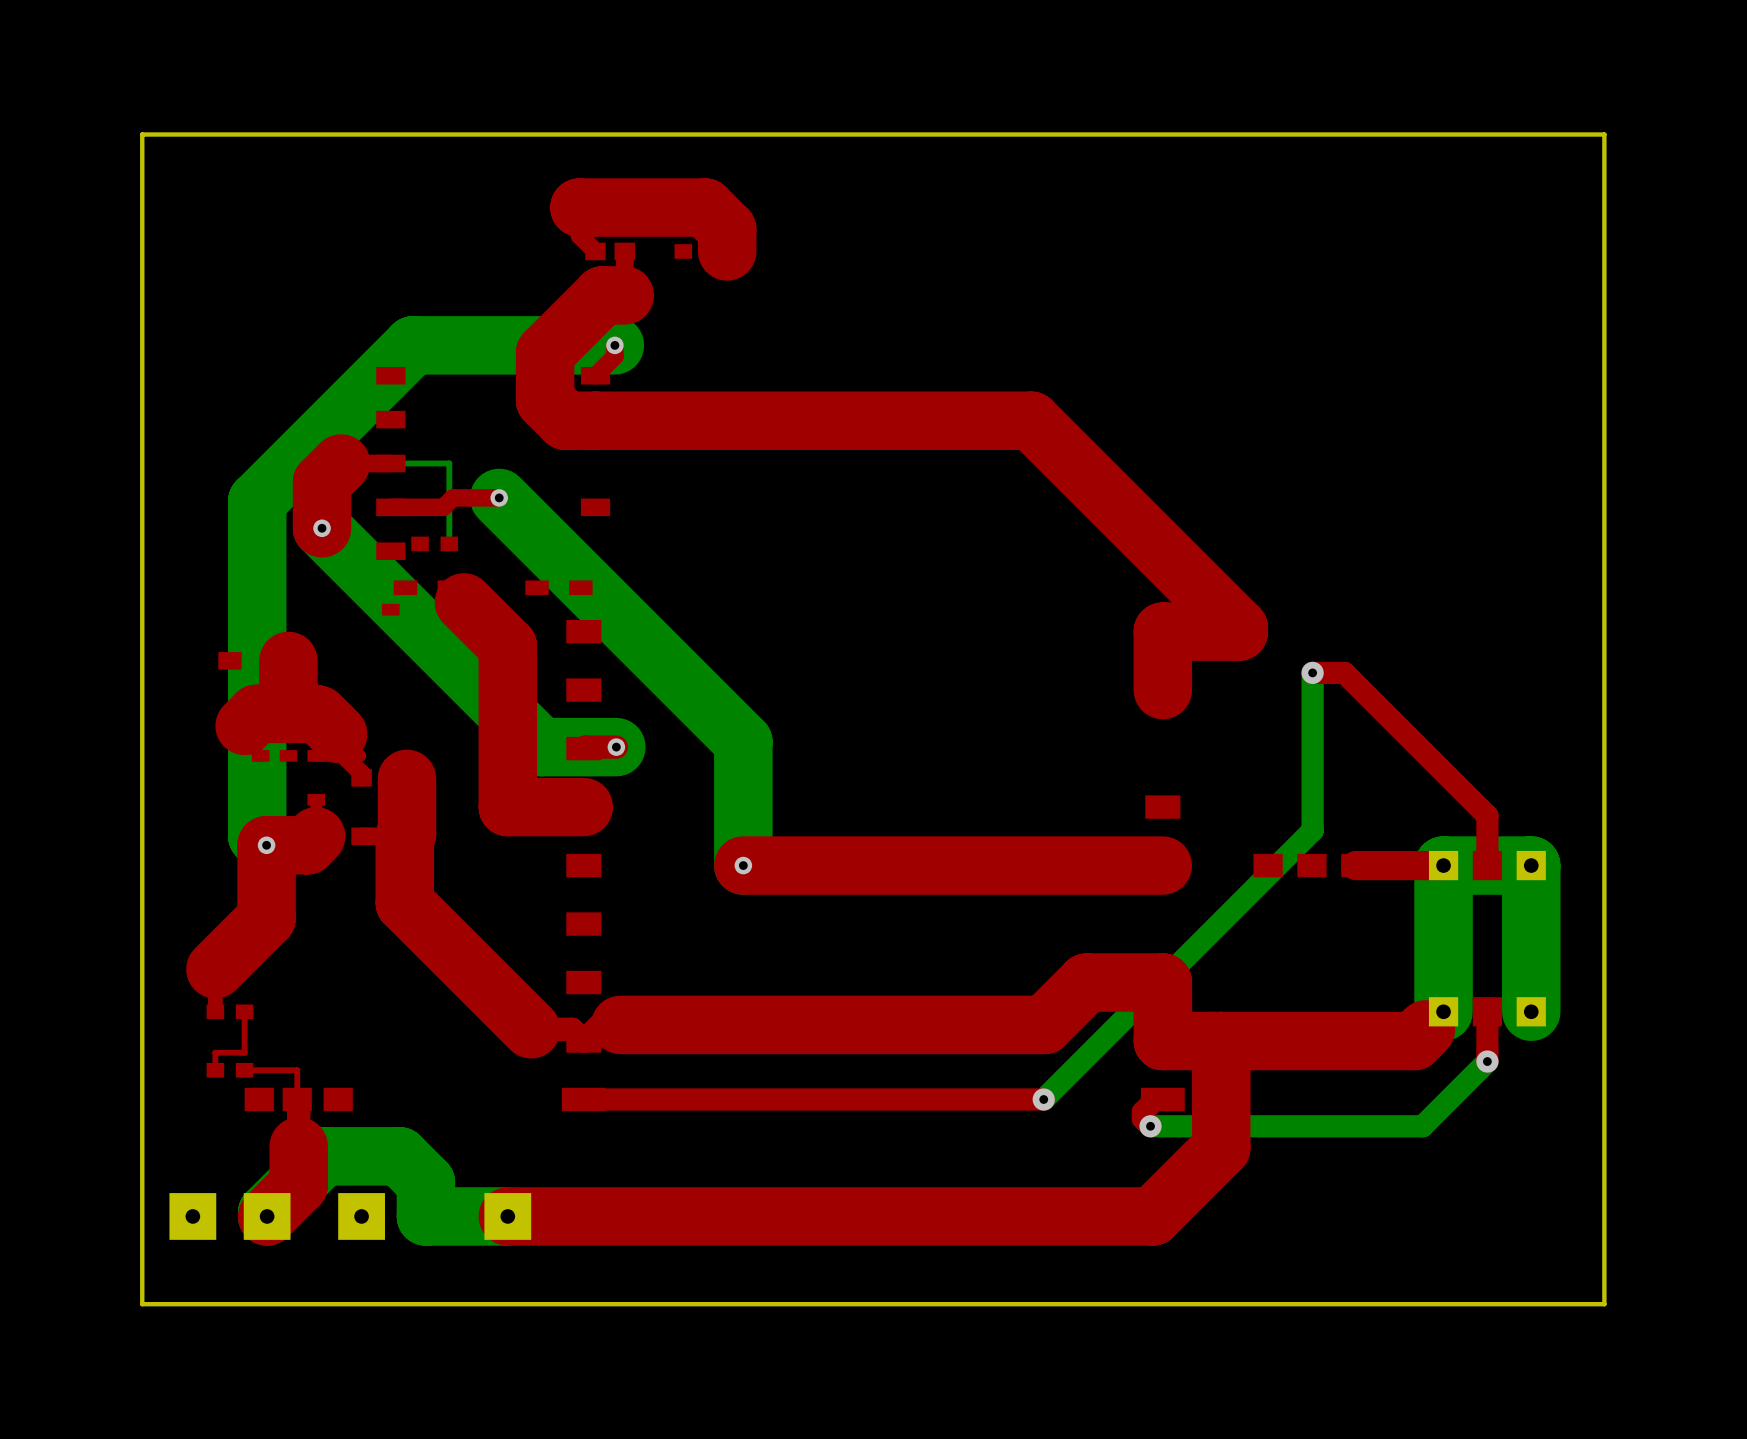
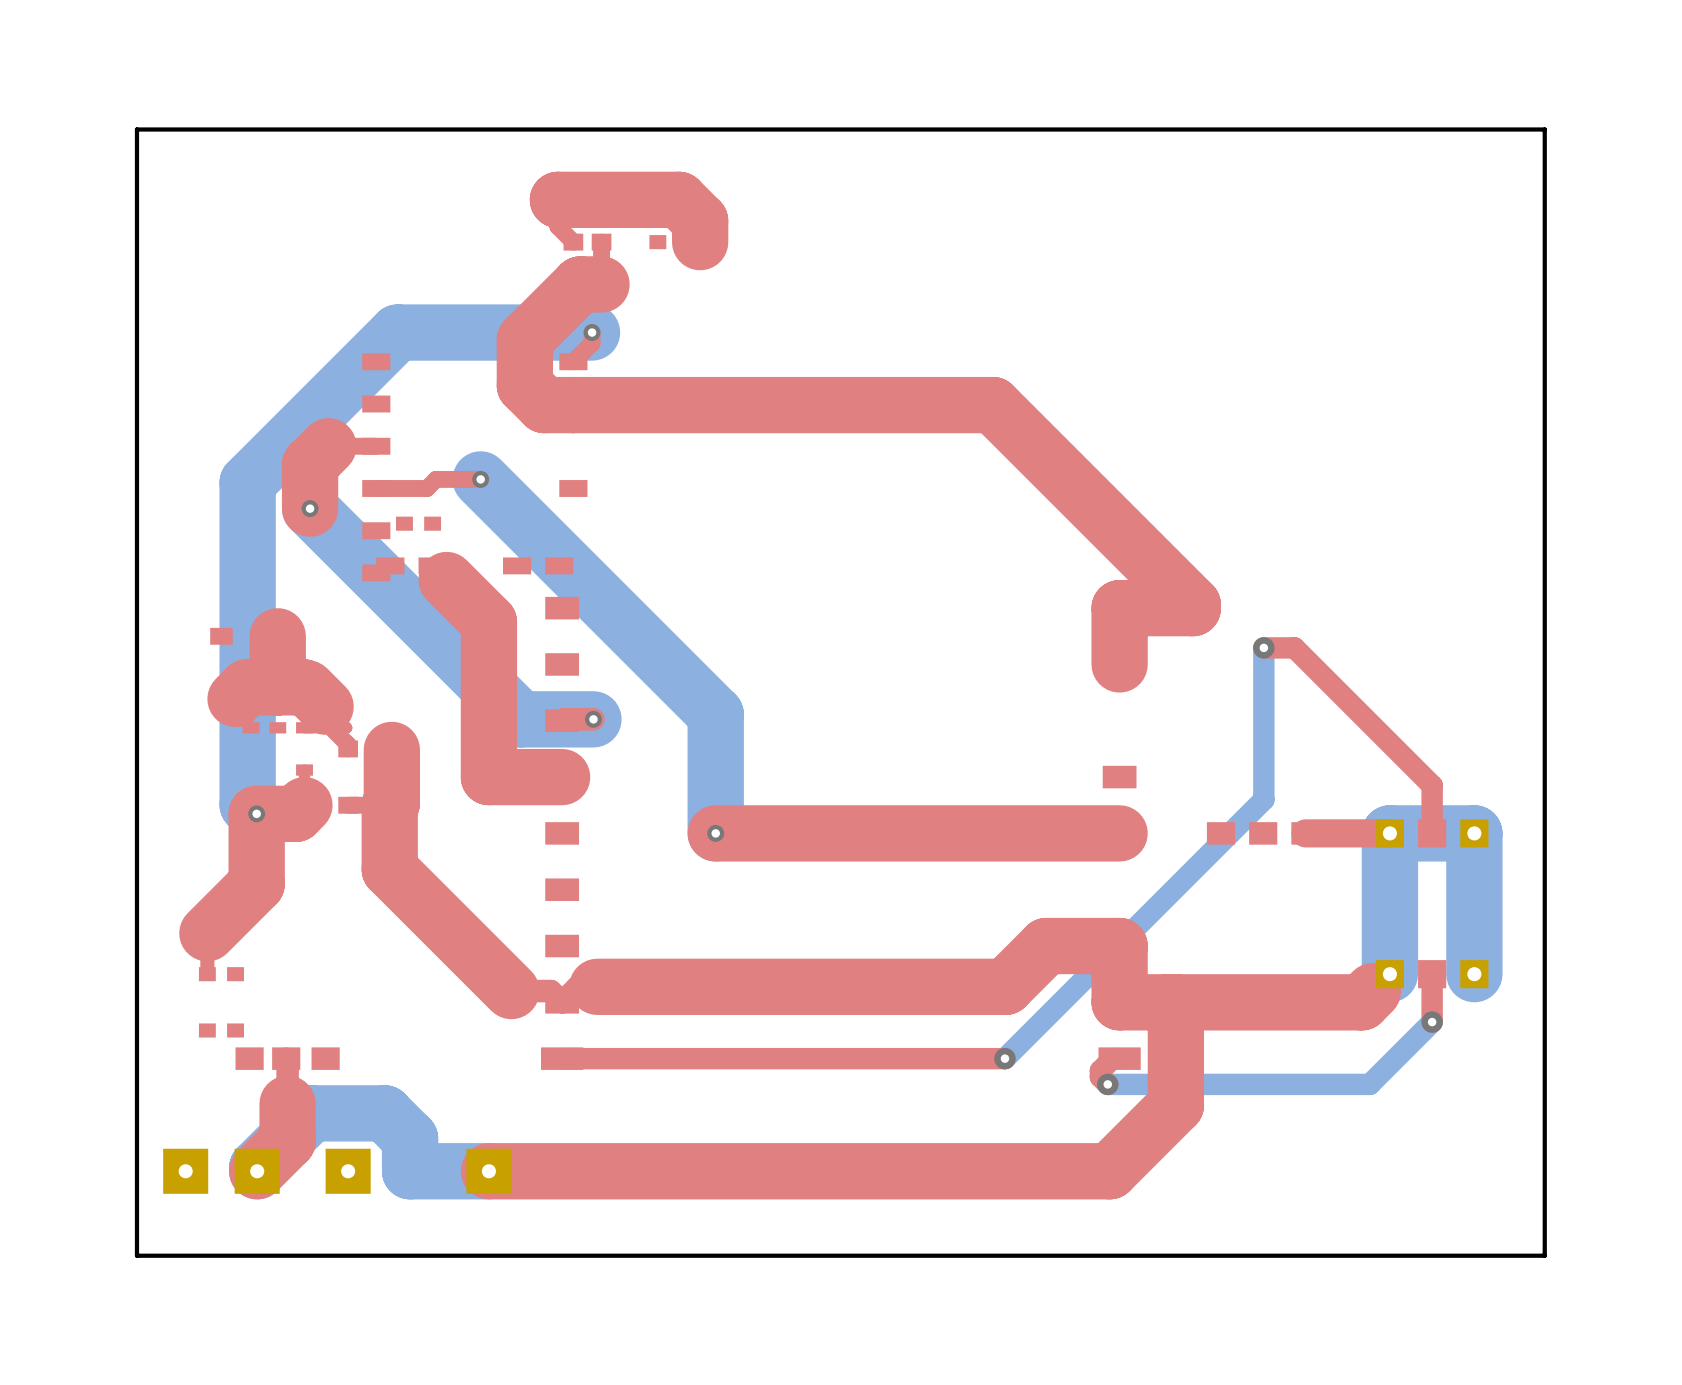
part footprint: [376, 366, 611, 616] -> [362, 353, 588, 582]
bottom track: (390, 463) (449, 463) (449, 543) -> none
top track: (244, 1011) (244, 1052) (215, 1052) (215, 1070) -> none
top track: (244, 1070) (297, 1070) (297, 1099) -> none

